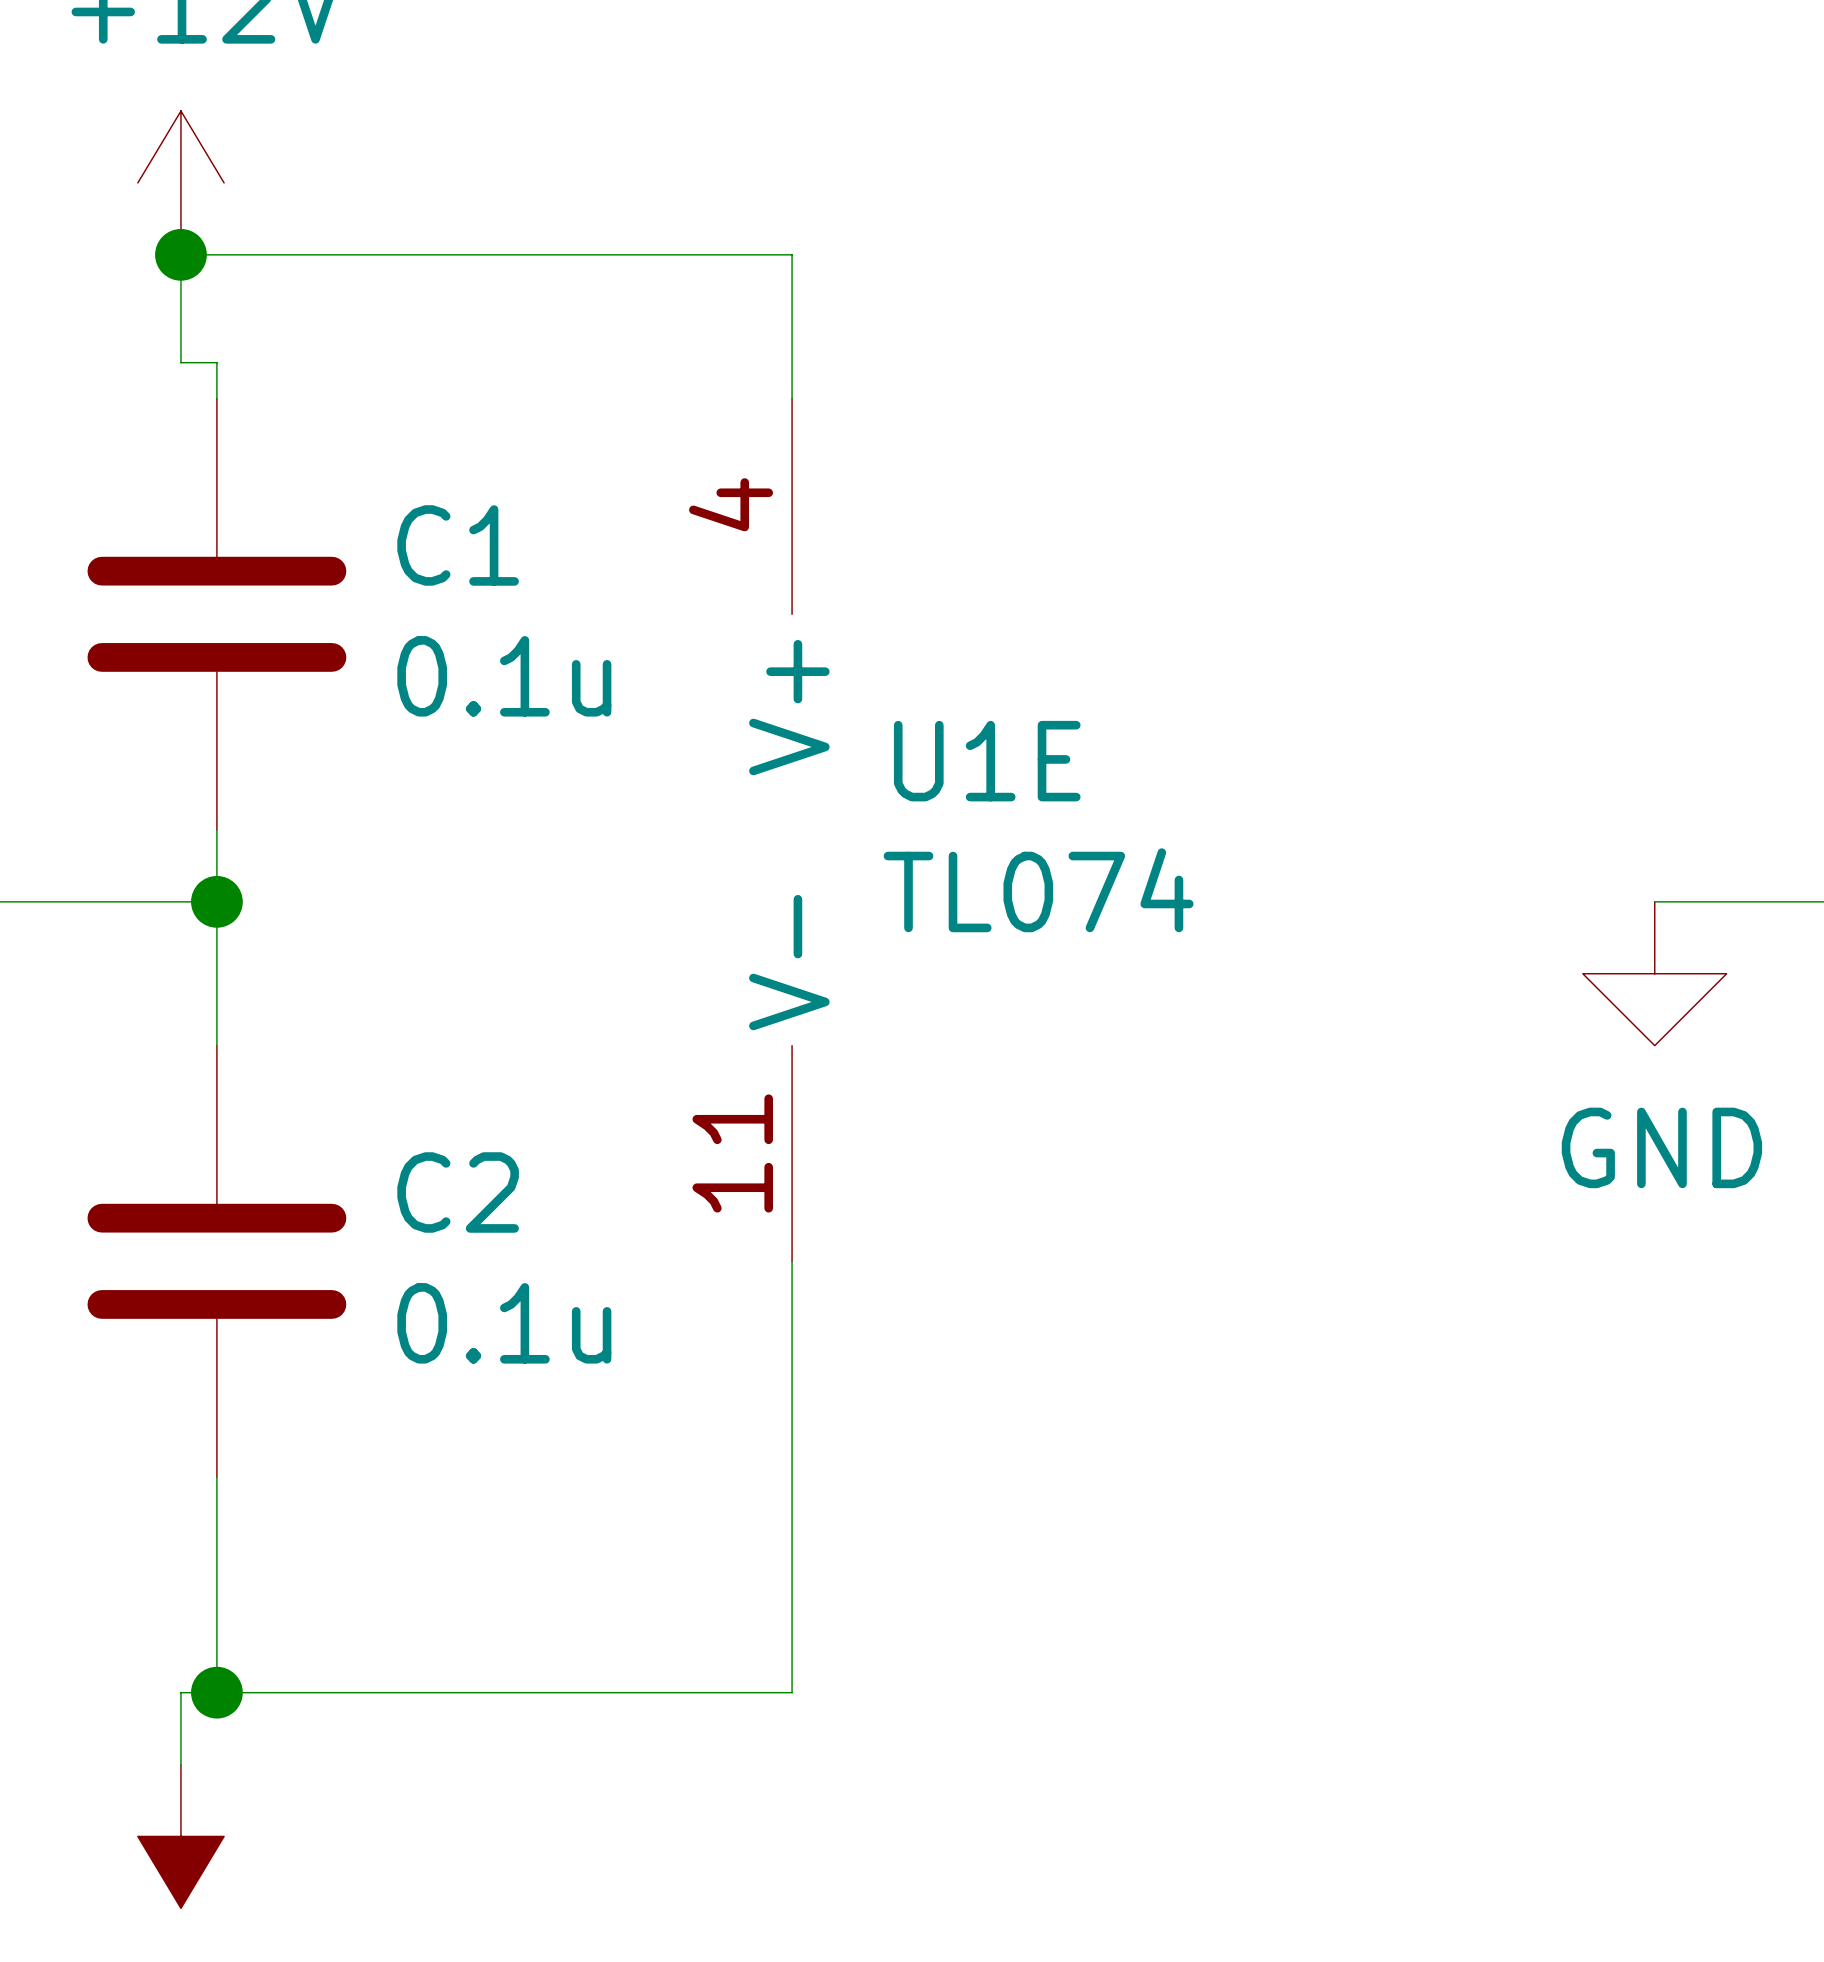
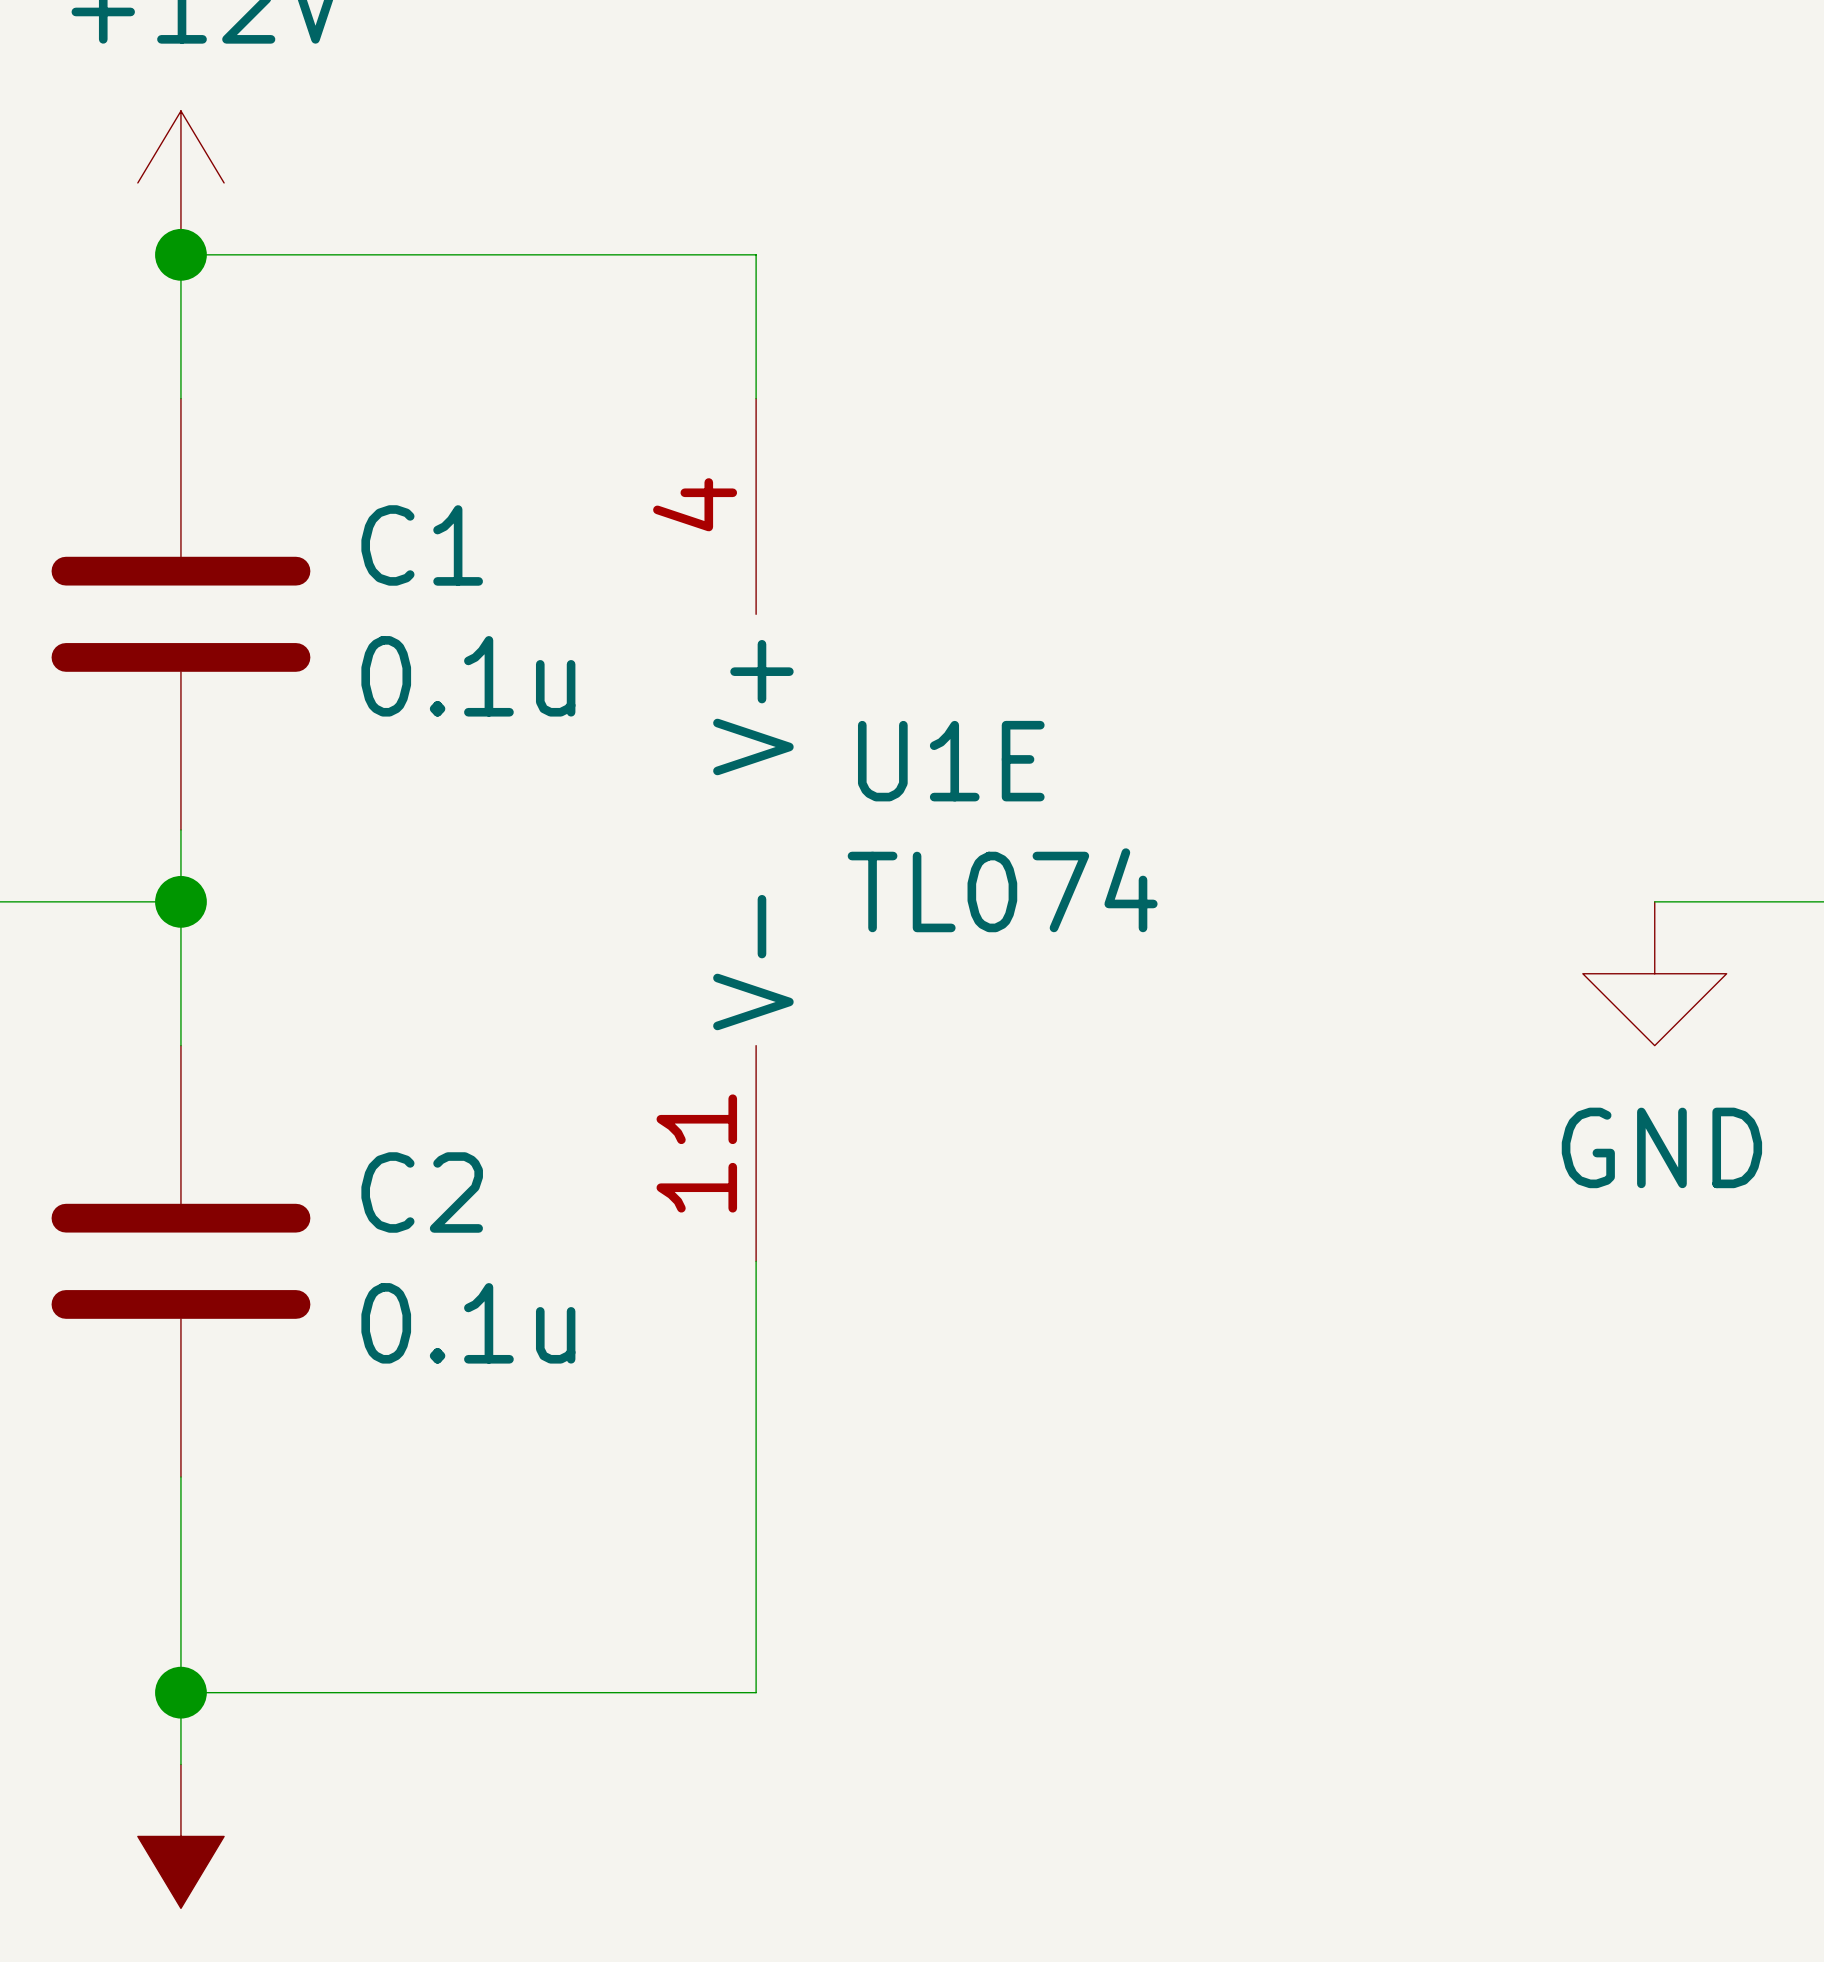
wire: (756, 254) (792, 254) (792, 398) -> (756, 254) (756, 398)
wire: (180, 362) (216, 362) (216, 398) -> (180, 362) (180, 398)
C1 position: (216, 614) -> (180, 614)
wire: (216, 829) (216, 1045) -> (180, 829) (180, 1045)
U1E position: (792, 829) -> (756, 829)
junction position: (216, 901) -> (180, 901)
C2 position: (216, 1261) -> (180, 1261)
wire: (792, 1261) (792, 1692) (756, 1692) -> (756, 1261) (756, 1692)
wire: (216, 1476) (216, 1692) -> (180, 1476) (180, 1692)
junction position: (216, 1692) -> (180, 1692)

